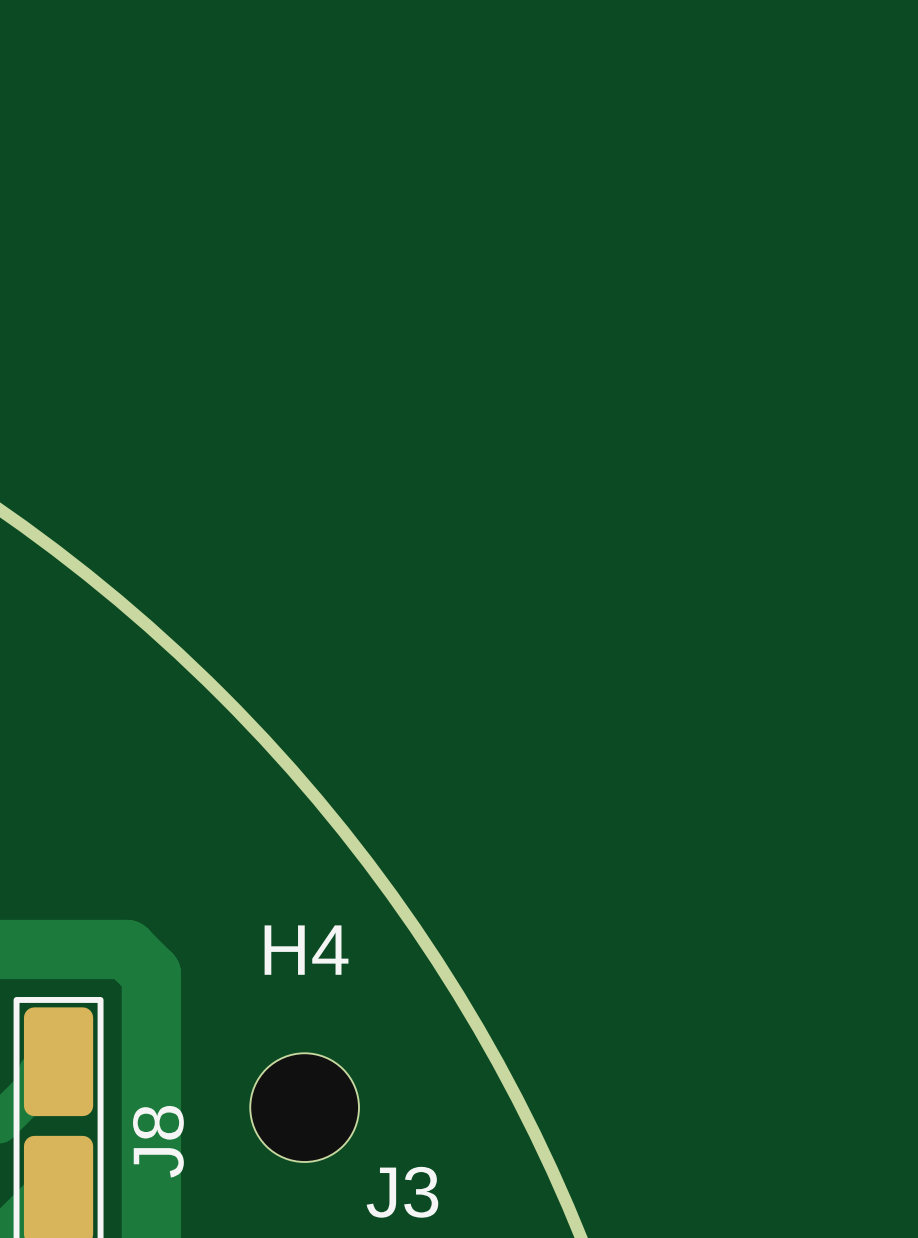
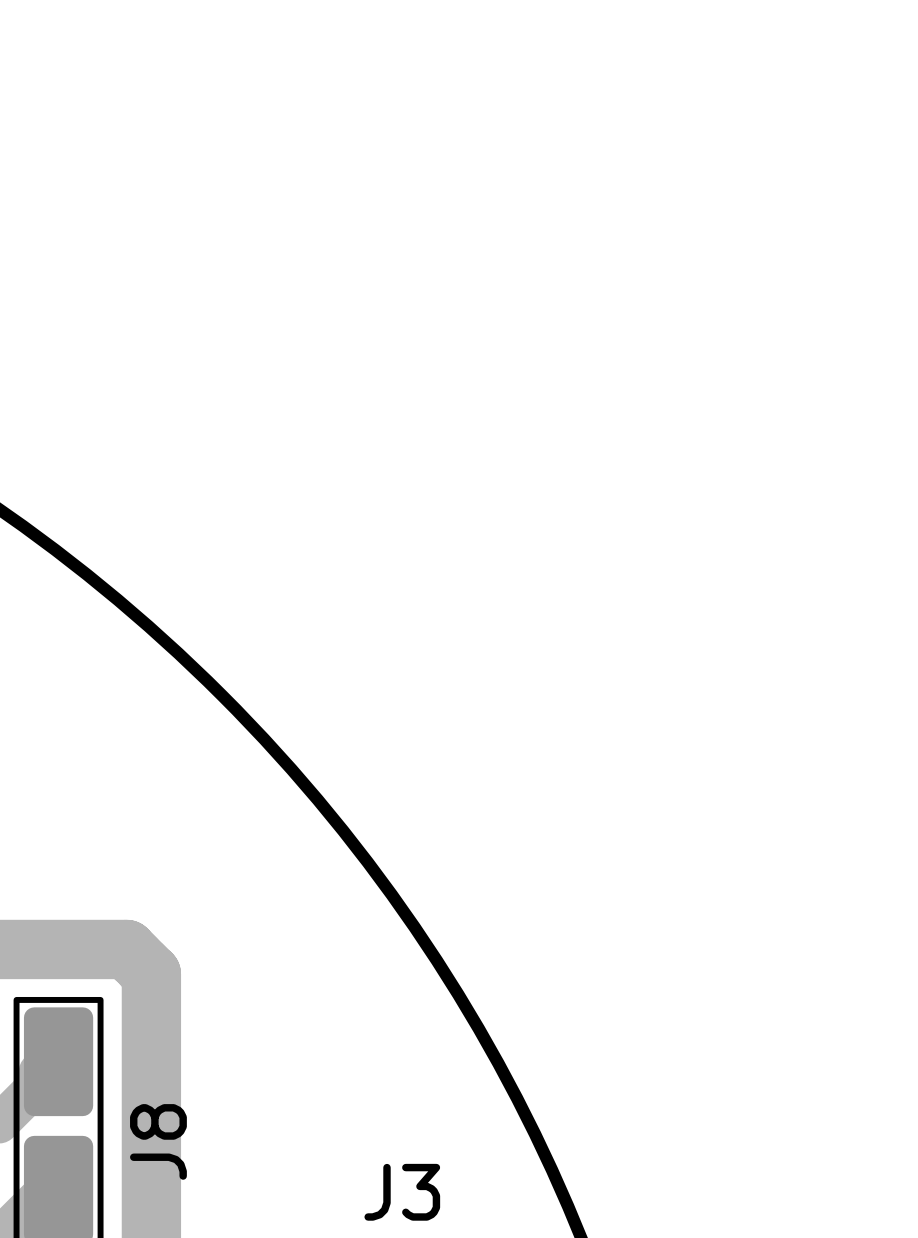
H4: (304, 1107) -> none

